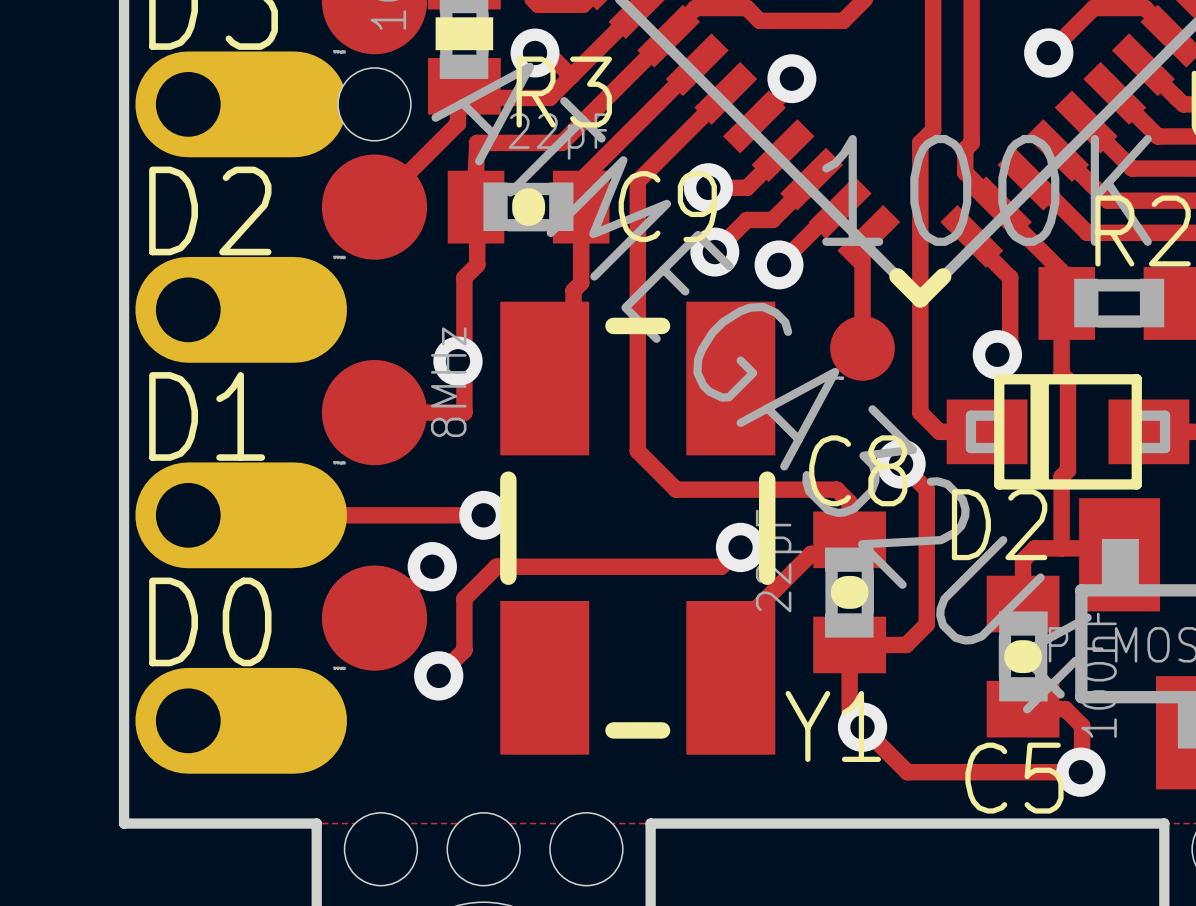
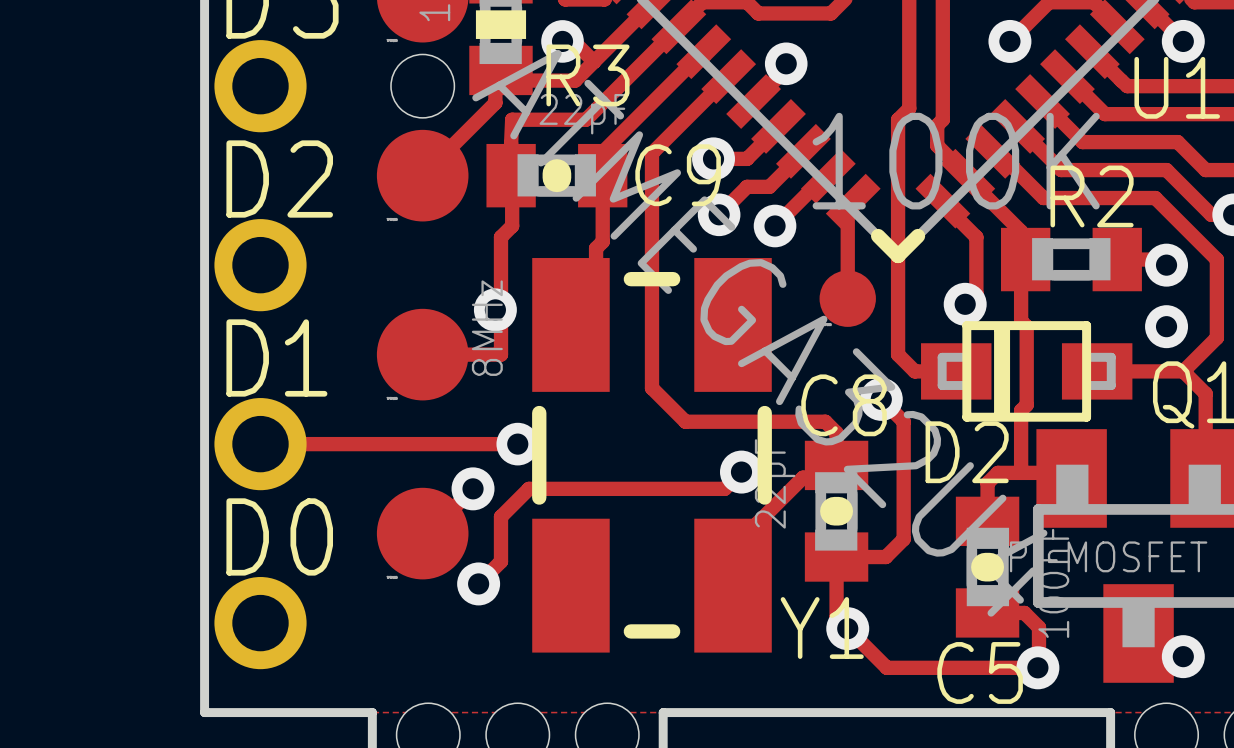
part footprint: [135, 51, 348, 158] -> [214, 40, 307, 133]
part footprint: [135, 256, 348, 363] -> [214, 219, 307, 312]
part footprint: [135, 462, 348, 569] -> [214, 398, 307, 491]
part footprint: [135, 667, 348, 774] -> [214, 577, 307, 670]

